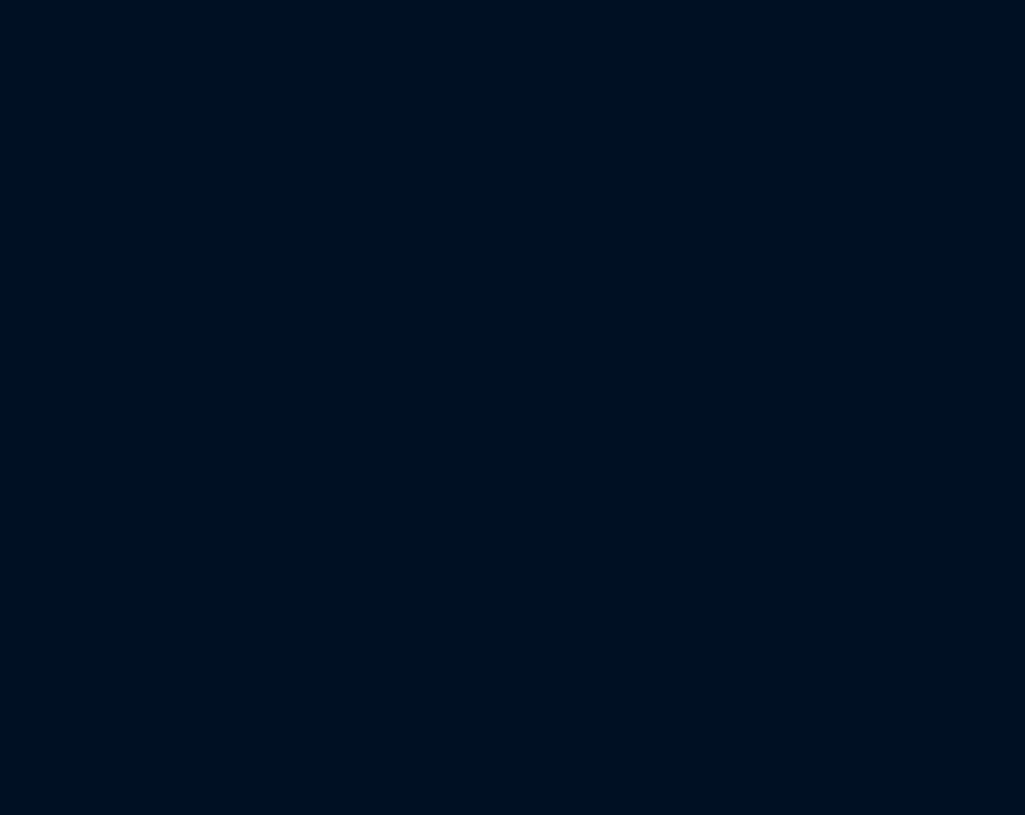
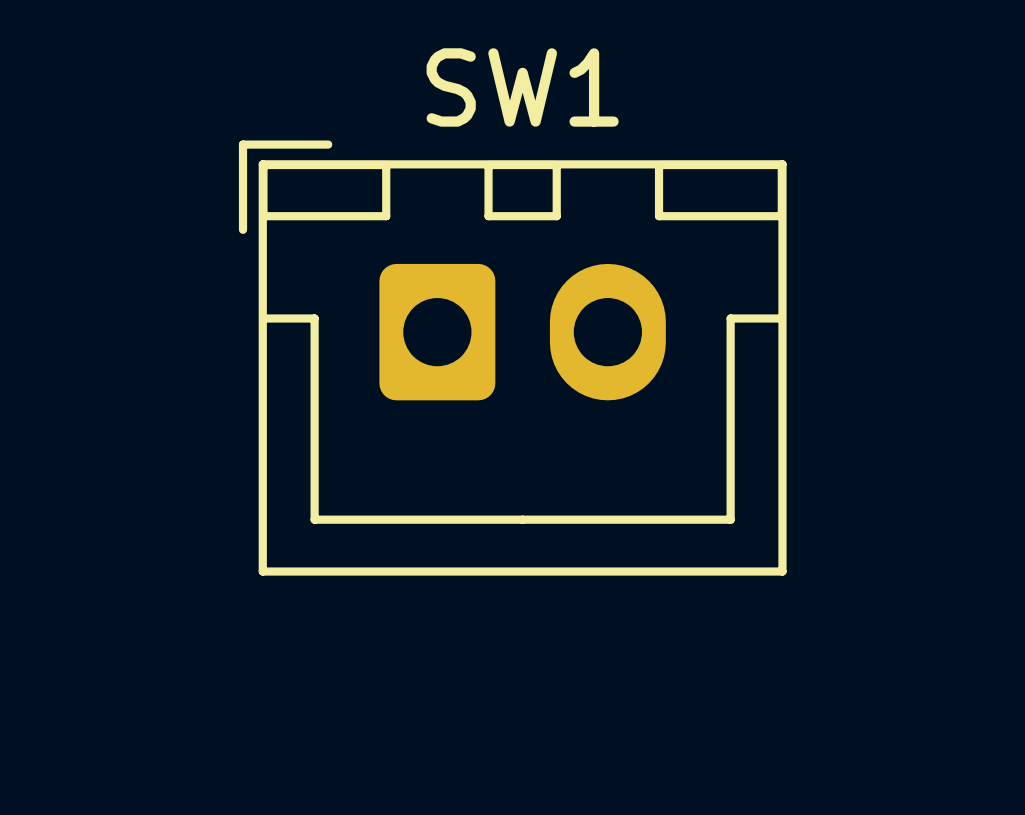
SW1: none -> (512, 358)

